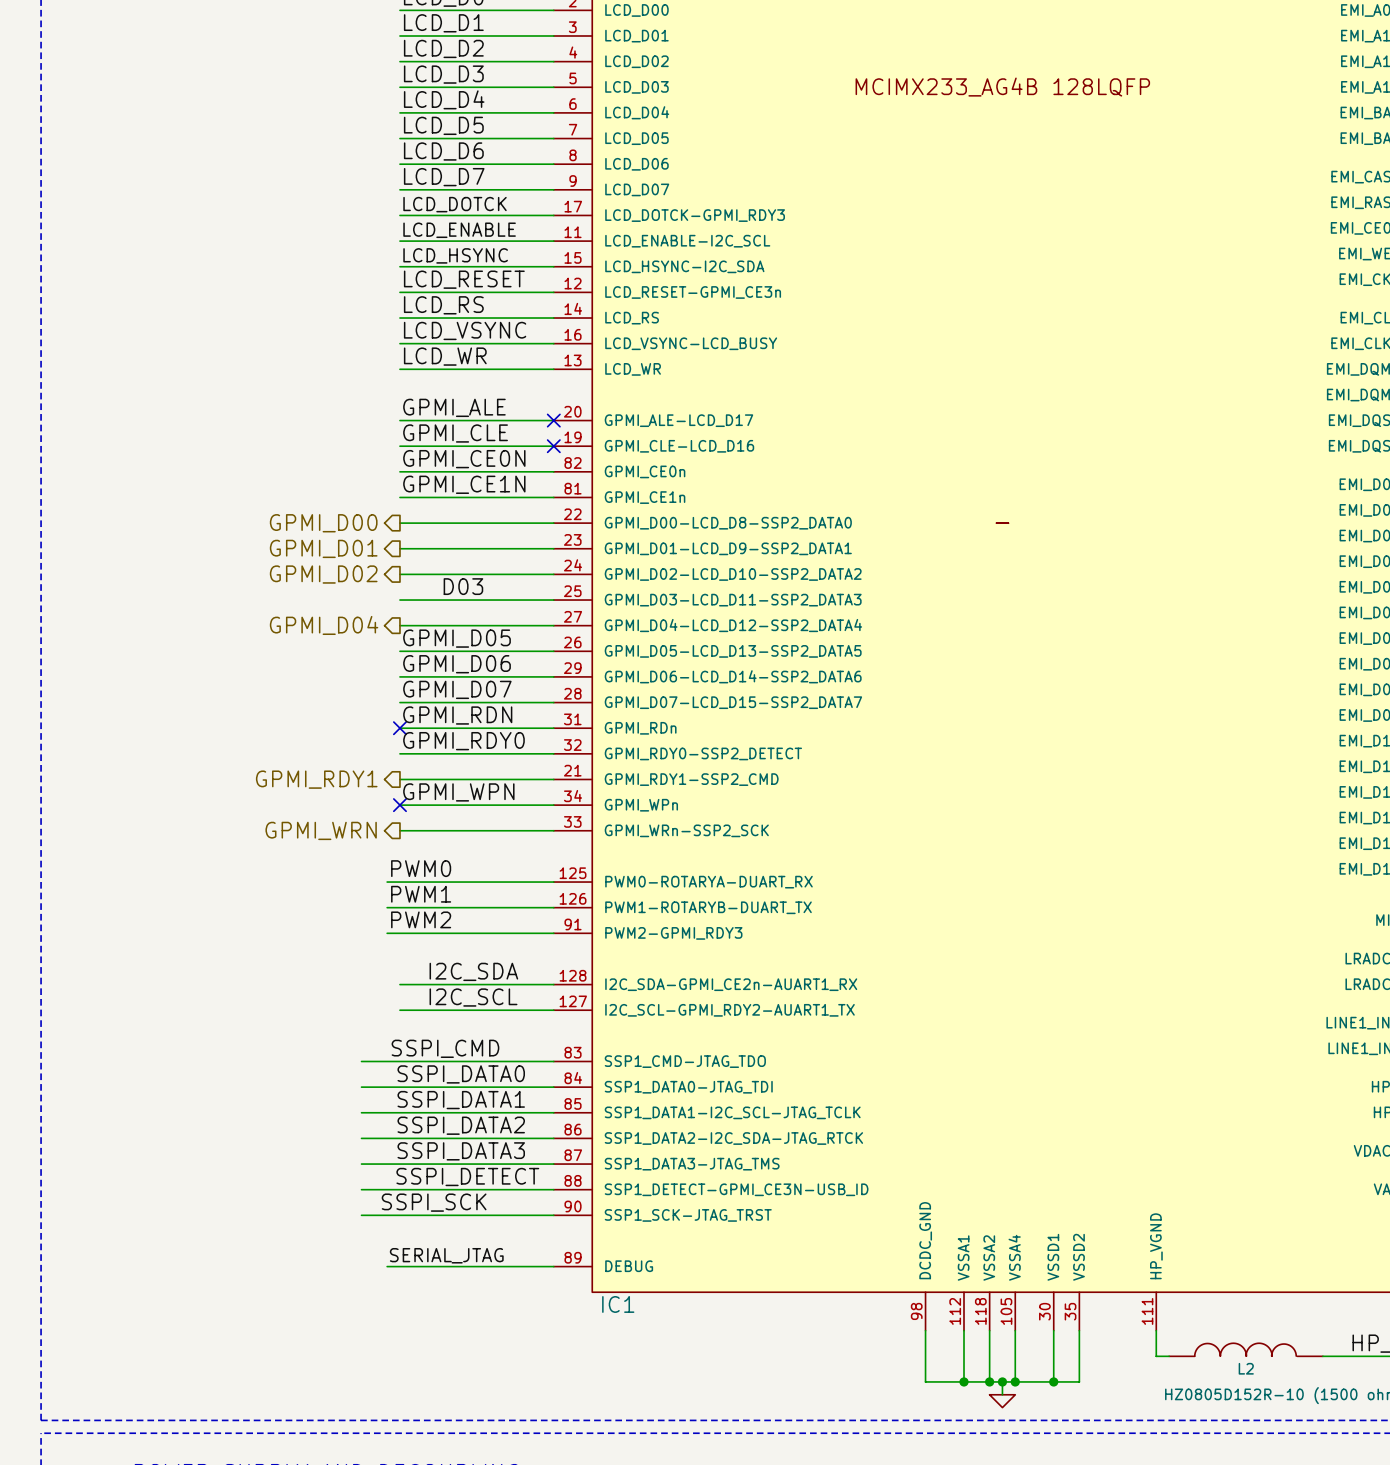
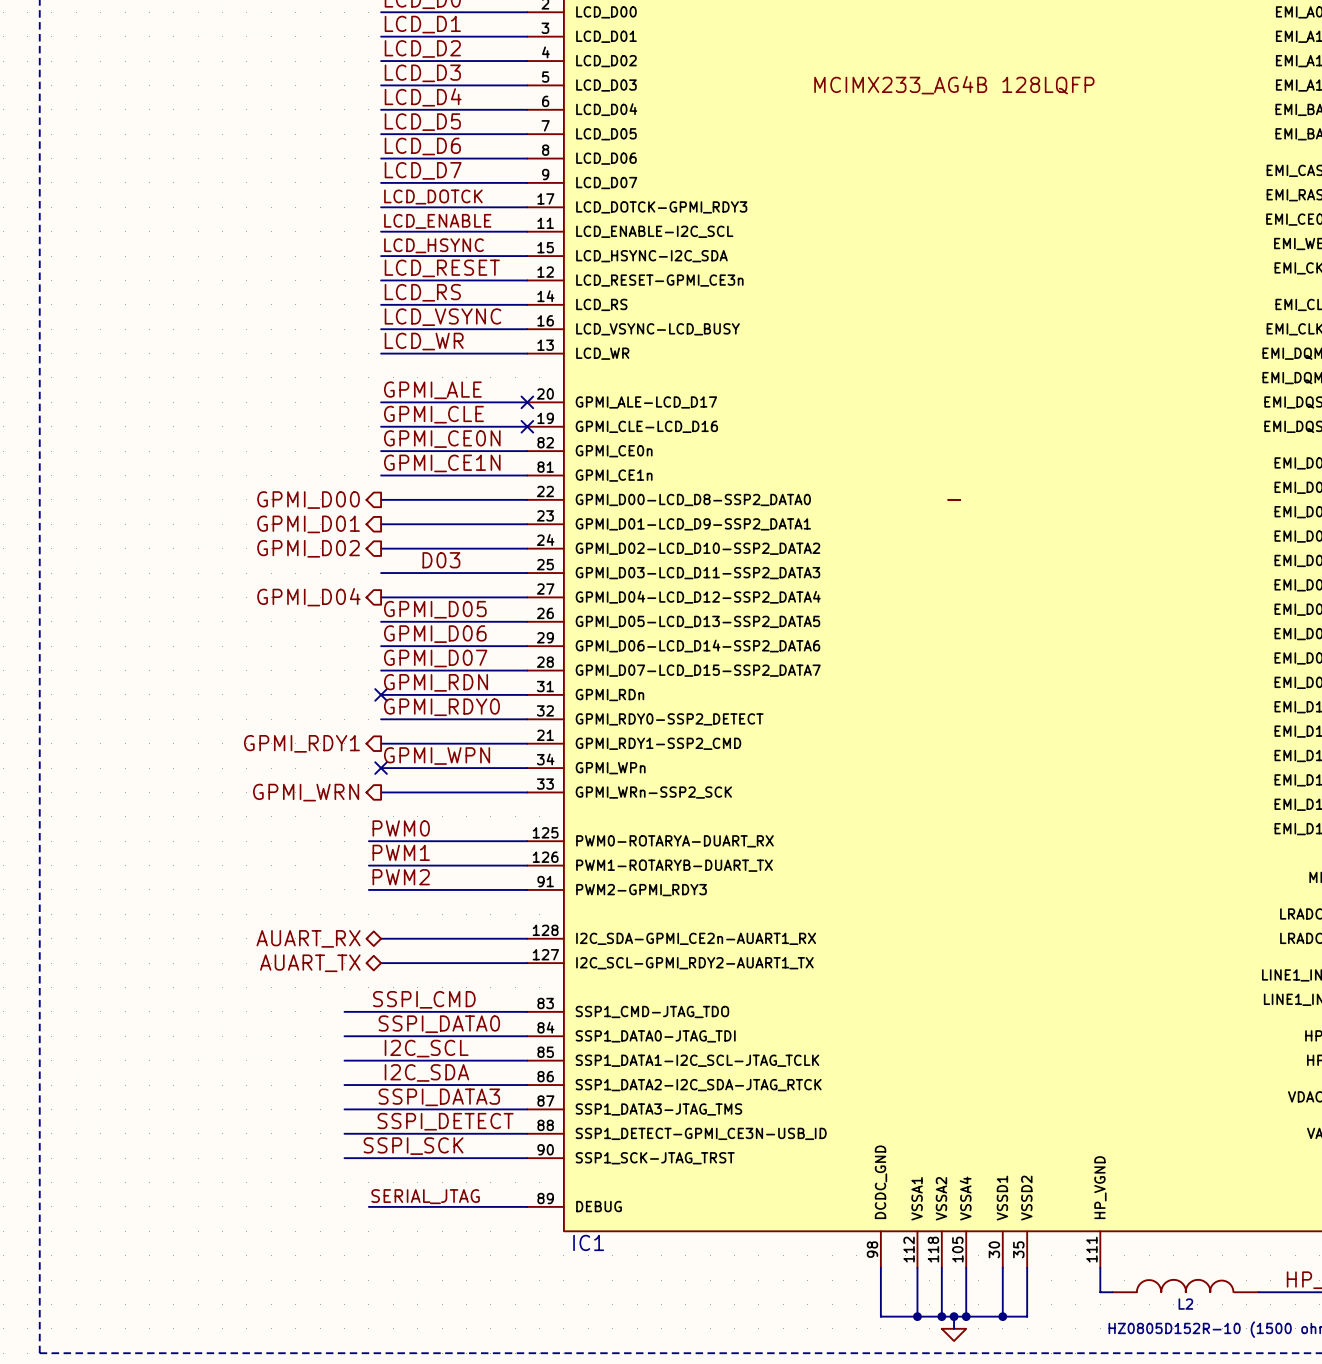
label position: I2C_SDA (473, 971) -> I2C_SDA (426, 1072)
hierarchical label: none -> AUART_RX (308, 938)
label position: I2C_SCL (473, 997) -> I2C_SCL (426, 1048)
hierarchical label: none -> AUART_TX (310, 963)
label: SSPI_DATA1 (461, 1100) -> none
label: SSPI_DATA2 (461, 1125) -> none

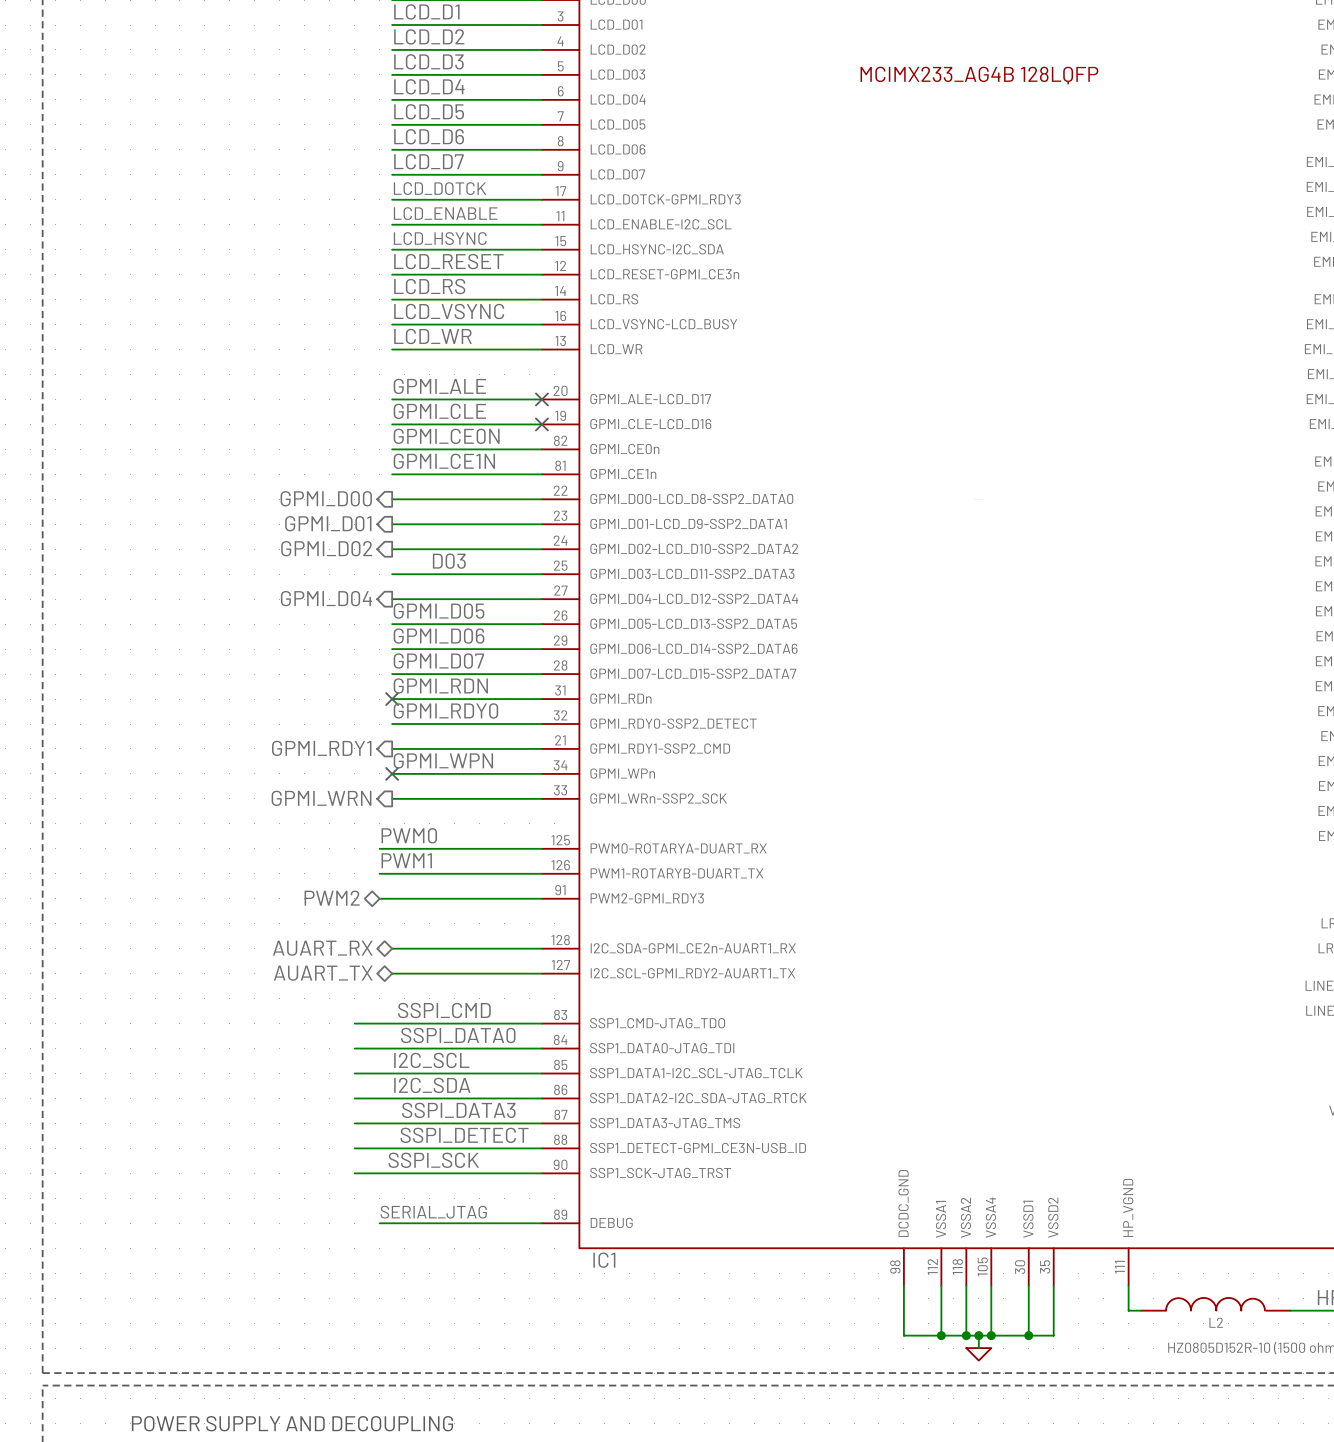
label: PWM2 (401, 877) -> none
hierarchical label: none -> PWM2 (332, 898)

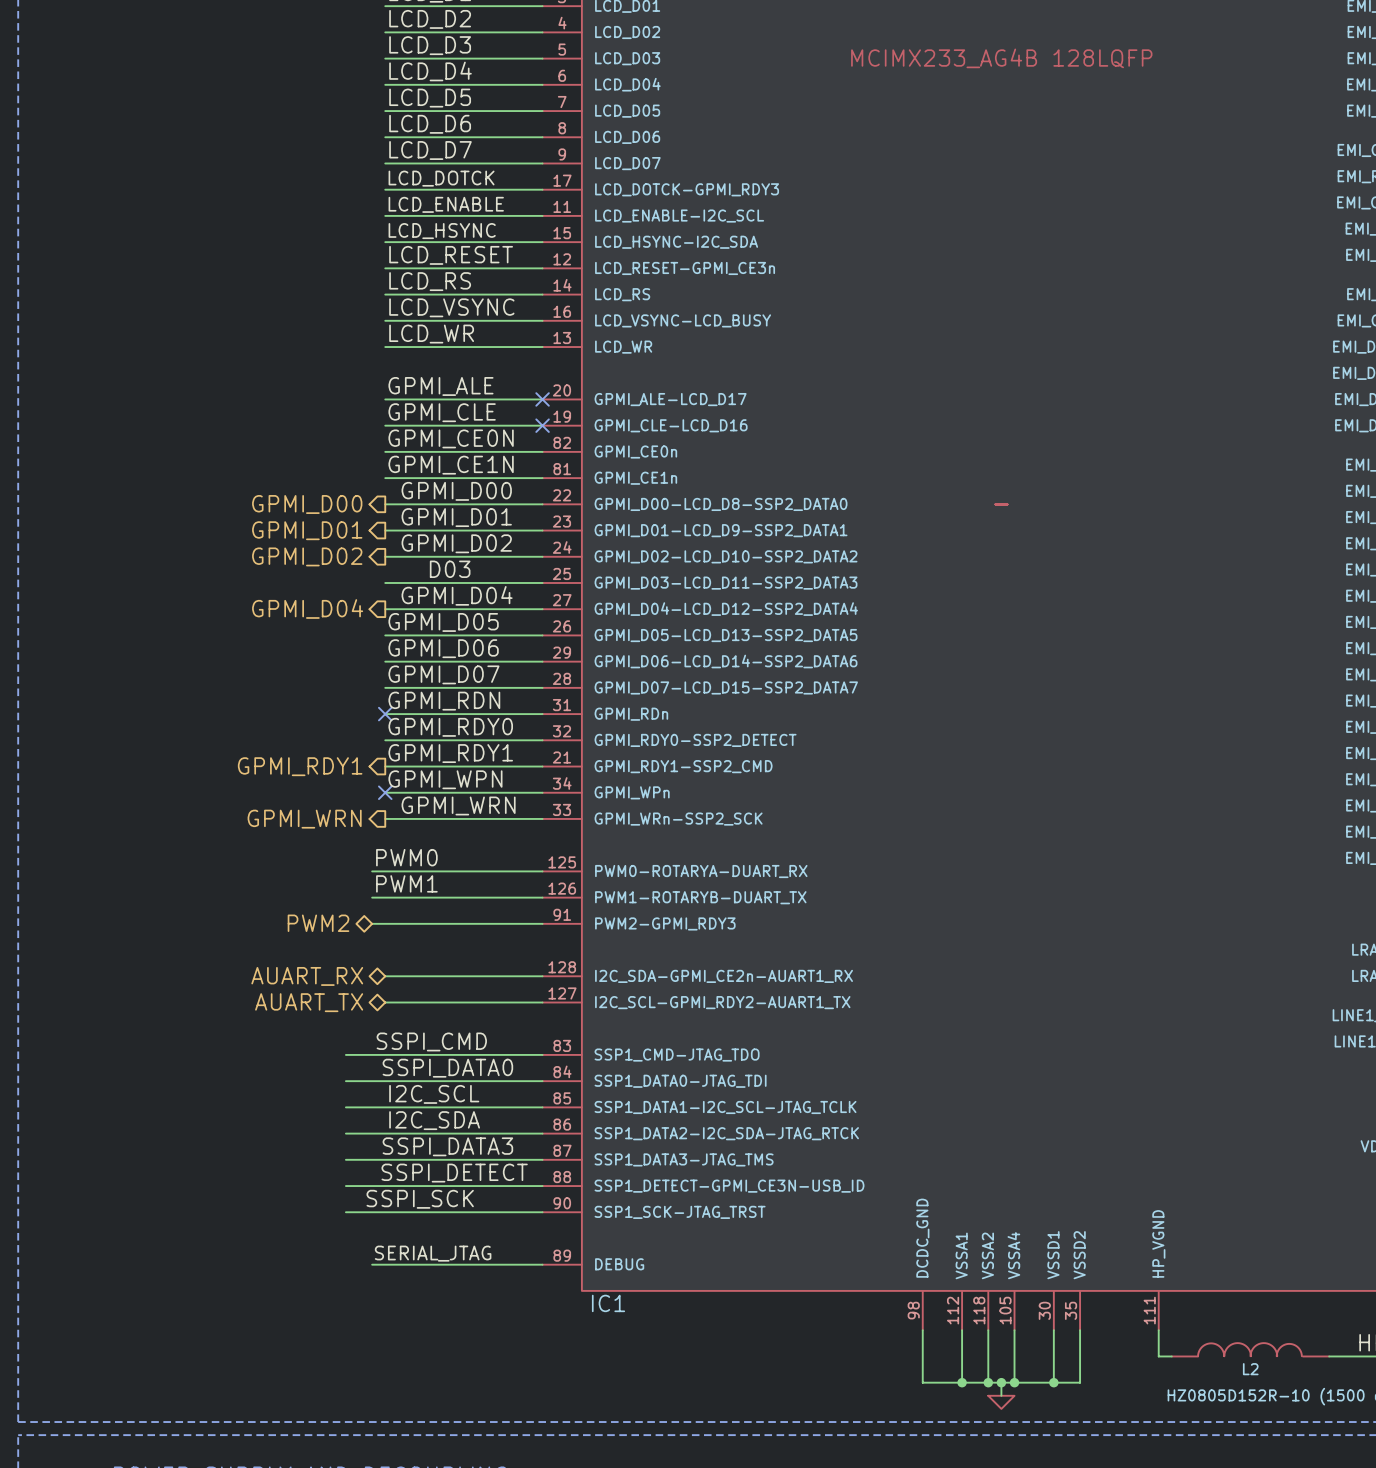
label: none -> GPMI_D00 (456, 491)
label: none -> GPMI_D01 (456, 517)
label: none -> GPMI_D02 (456, 543)
label: none -> GPMI_D04 (457, 595)
label: none -> GPMI_RDY1 (450, 753)
label: none -> GPMI_WRN (458, 805)

